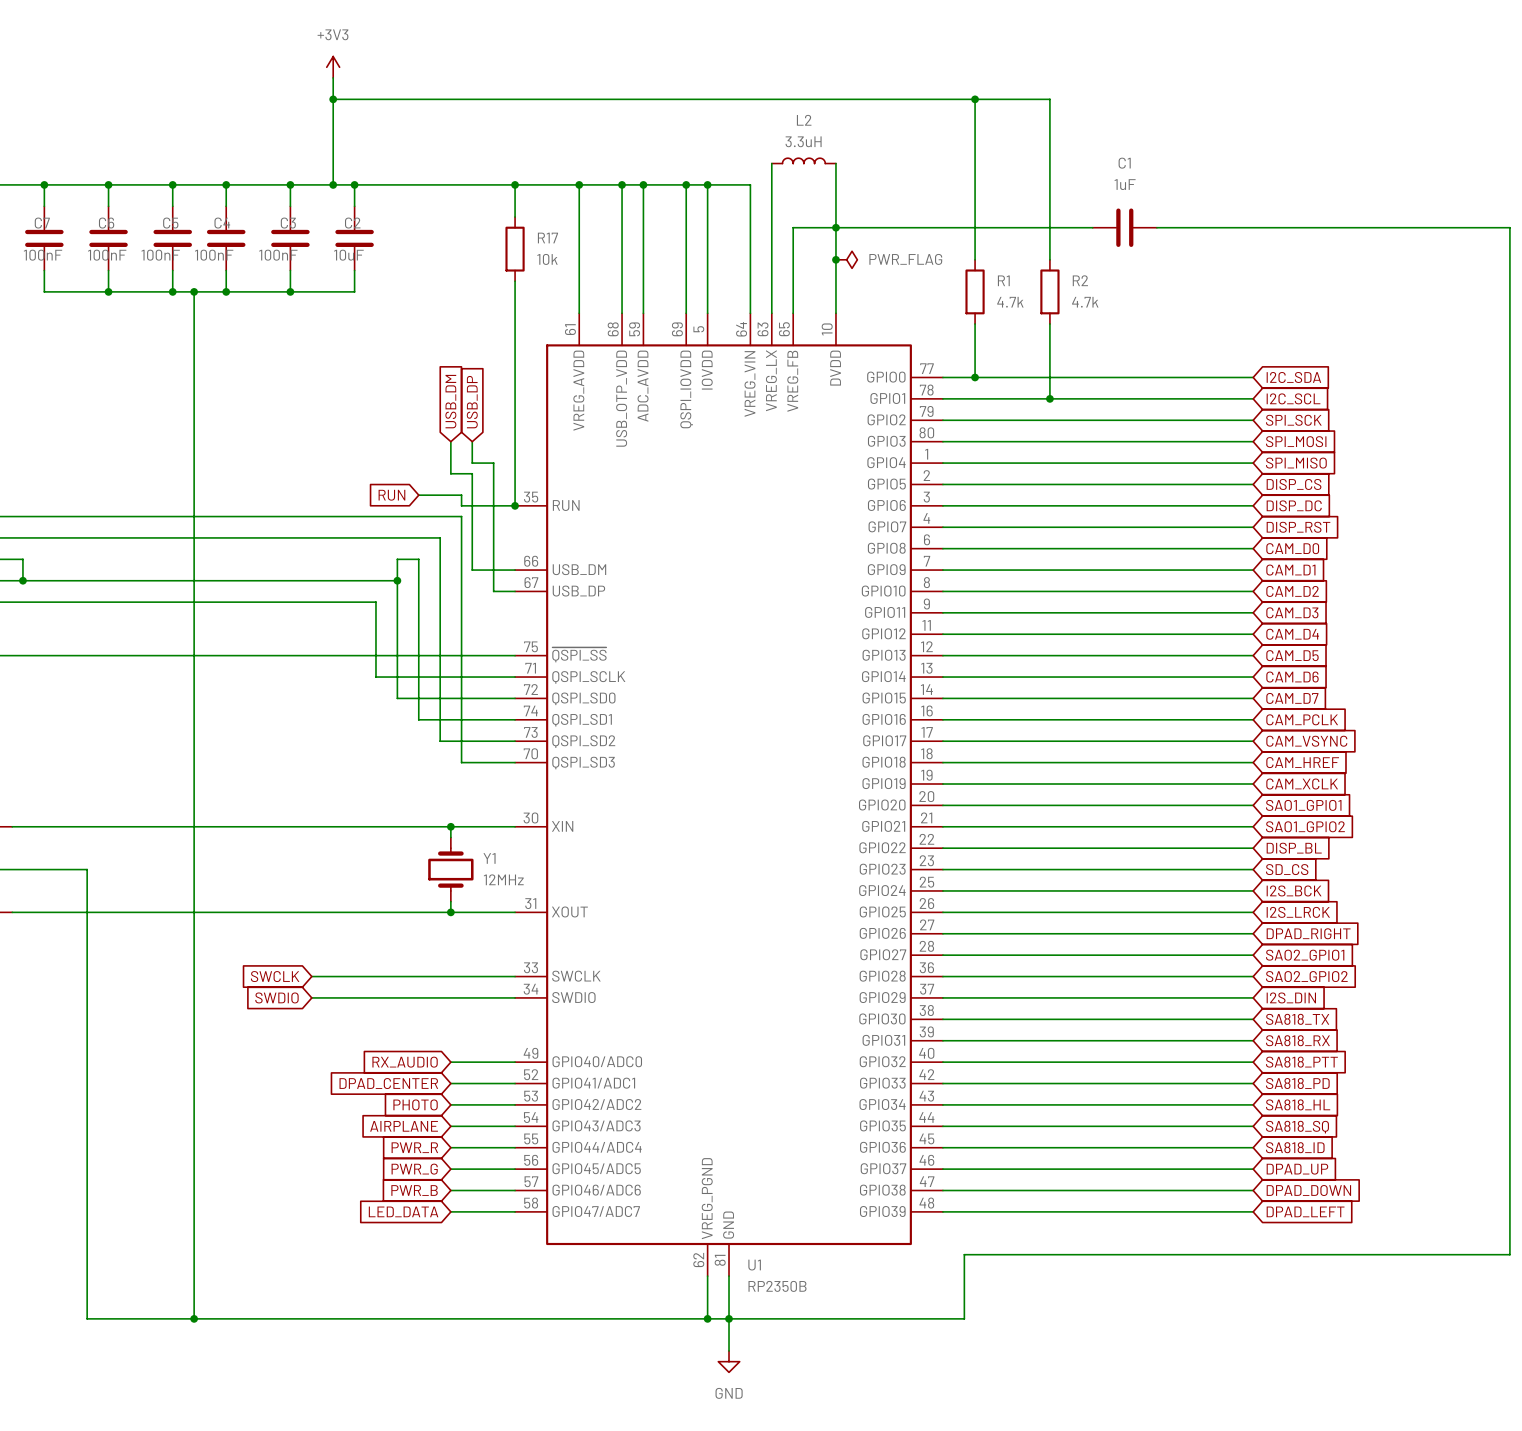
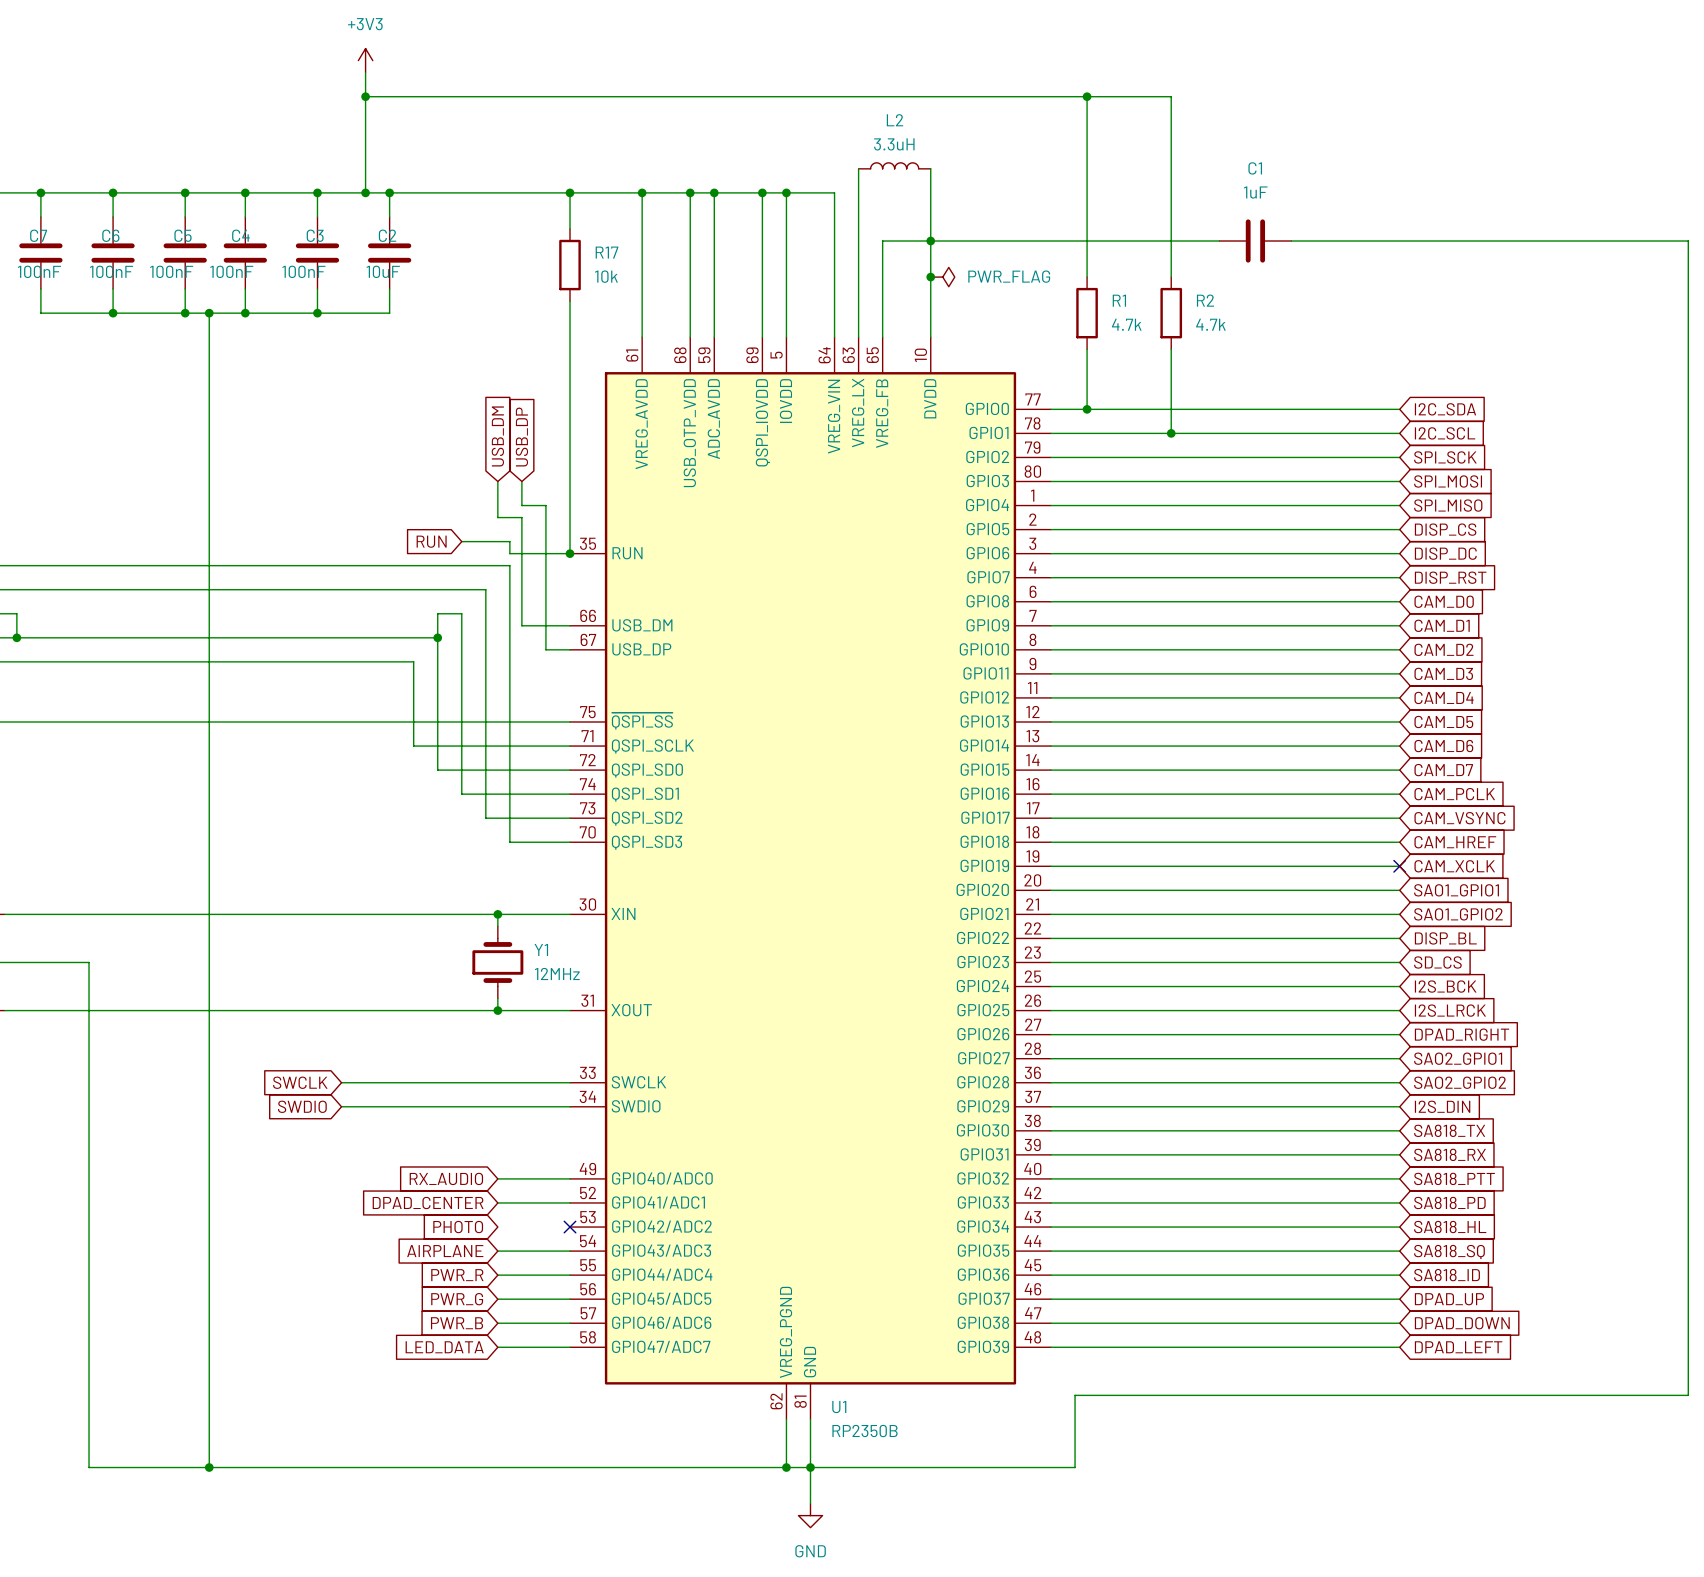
no-connect mark: none -> (1399, 866)
wire: (450, 1104) (515, 1104) -> none
no-connect mark: none -> (570, 1227)

